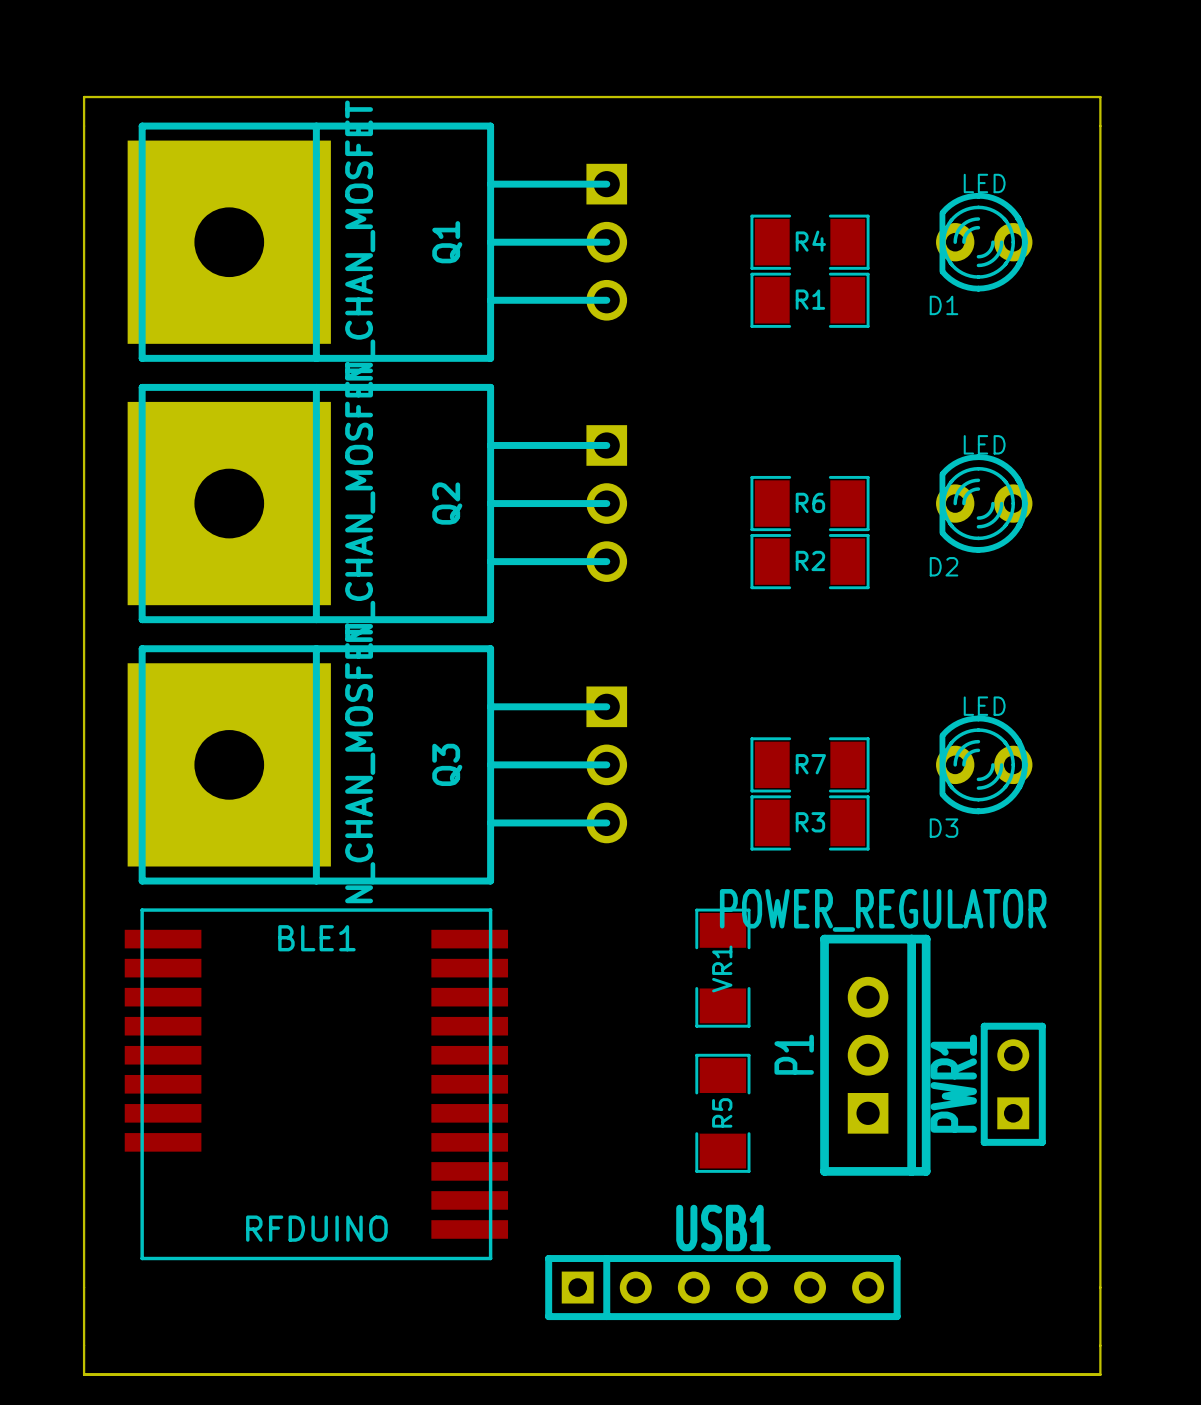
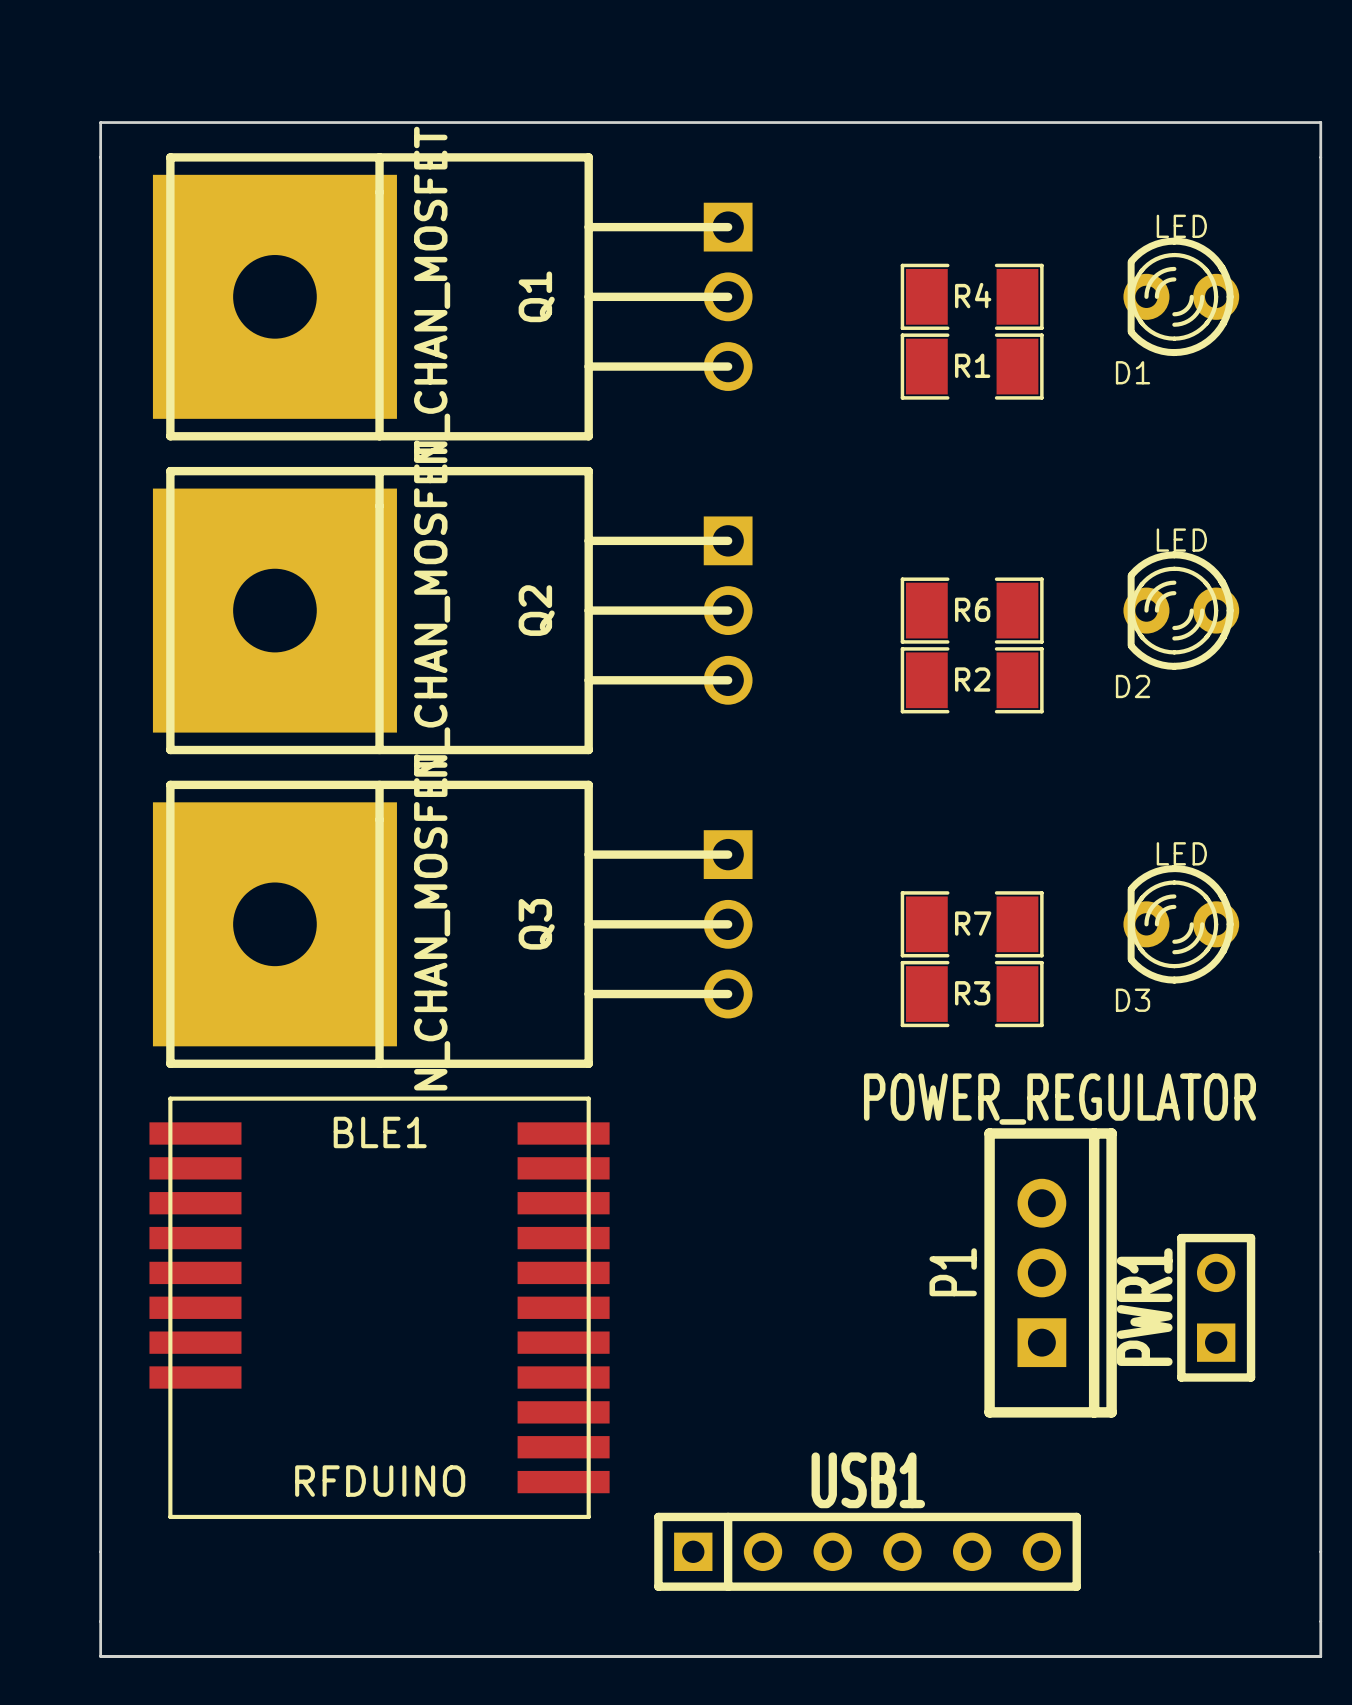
VR1: (722, 968) -> none
R5: (722, 1113) -> none

